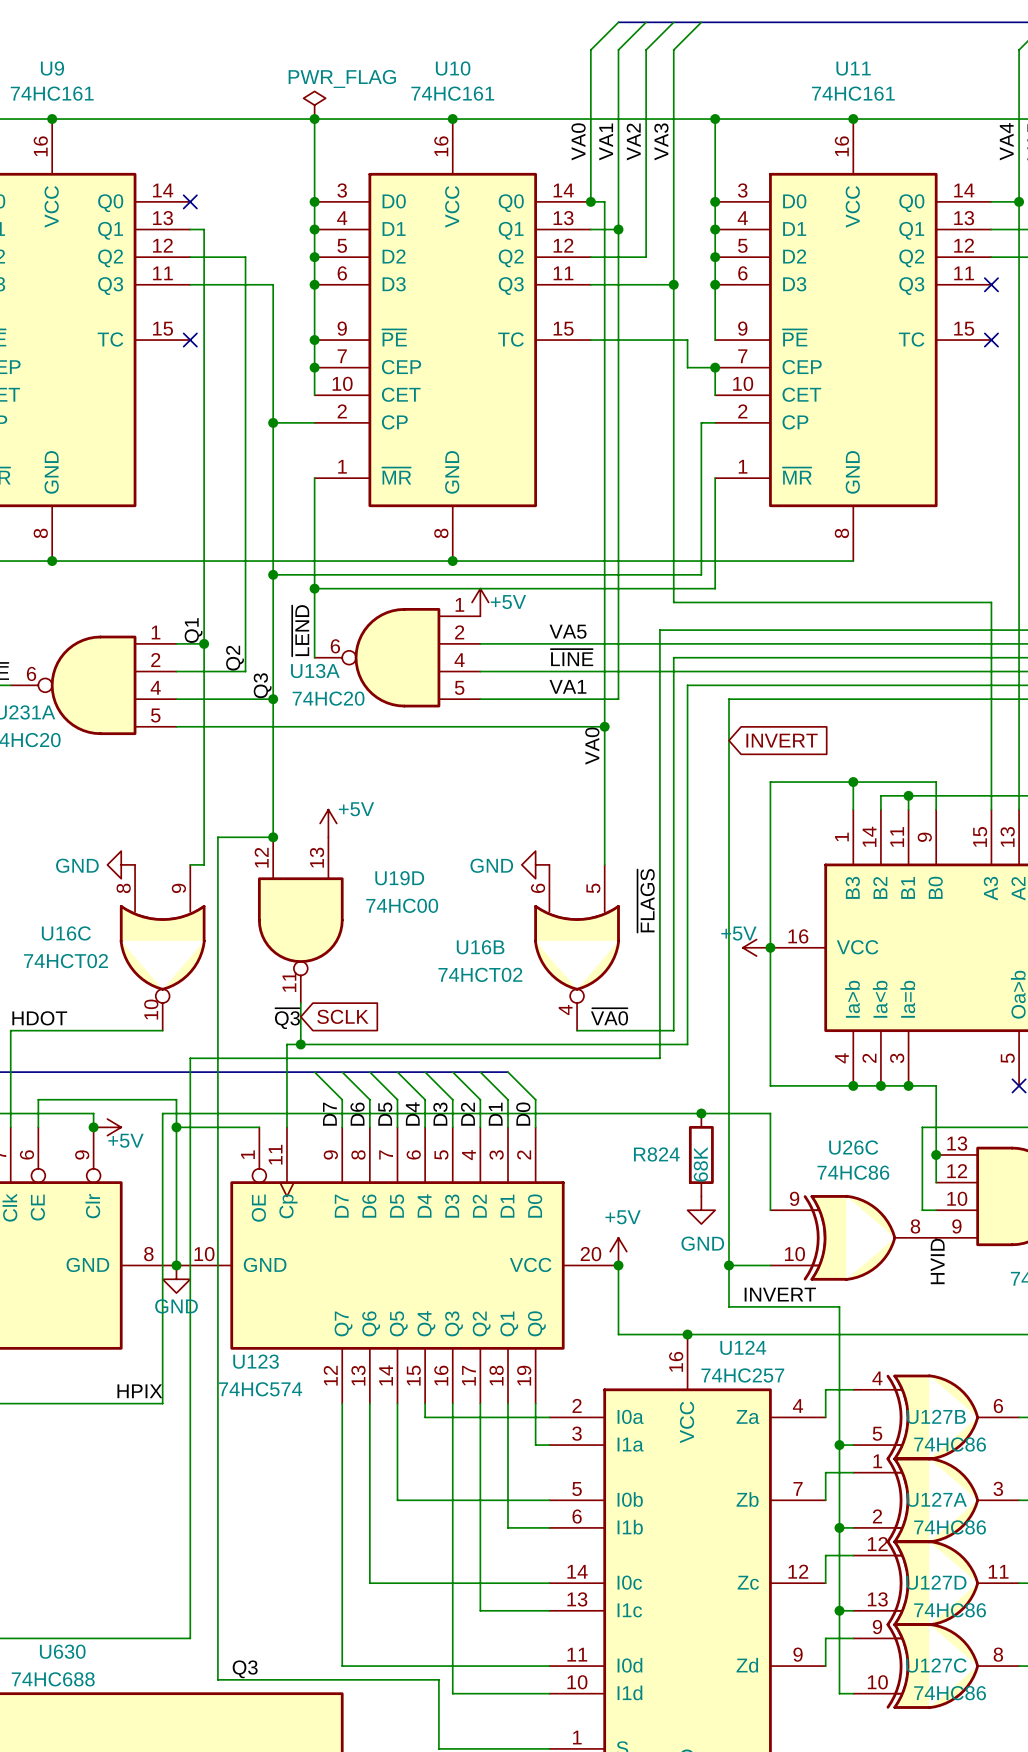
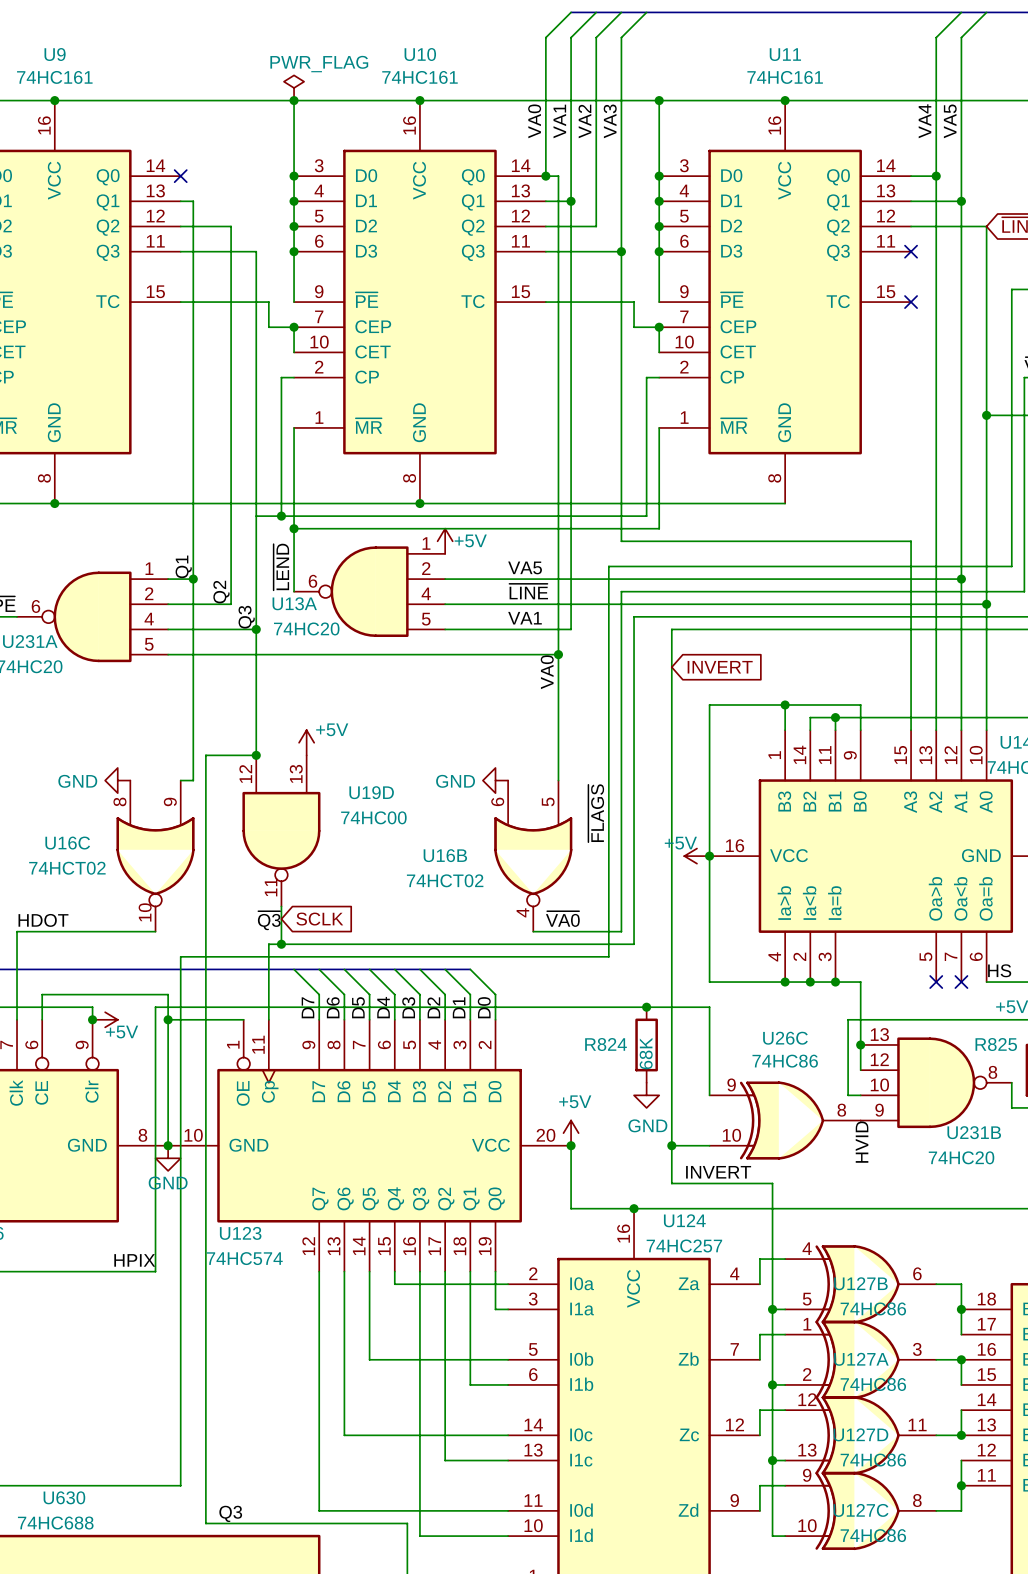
no-connect mark: (190, 340) -> none
wire: (314, 340) (314, 367) -> (180, 302) (268, 302) (268, 327) (294, 327)
junction: (314, 340) -> none
wire: (273, 422) (300, 422) -> (281, 516) (281, 377)
junction: (273, 422) -> none
junction position: (273, 574) -> (281, 516)

